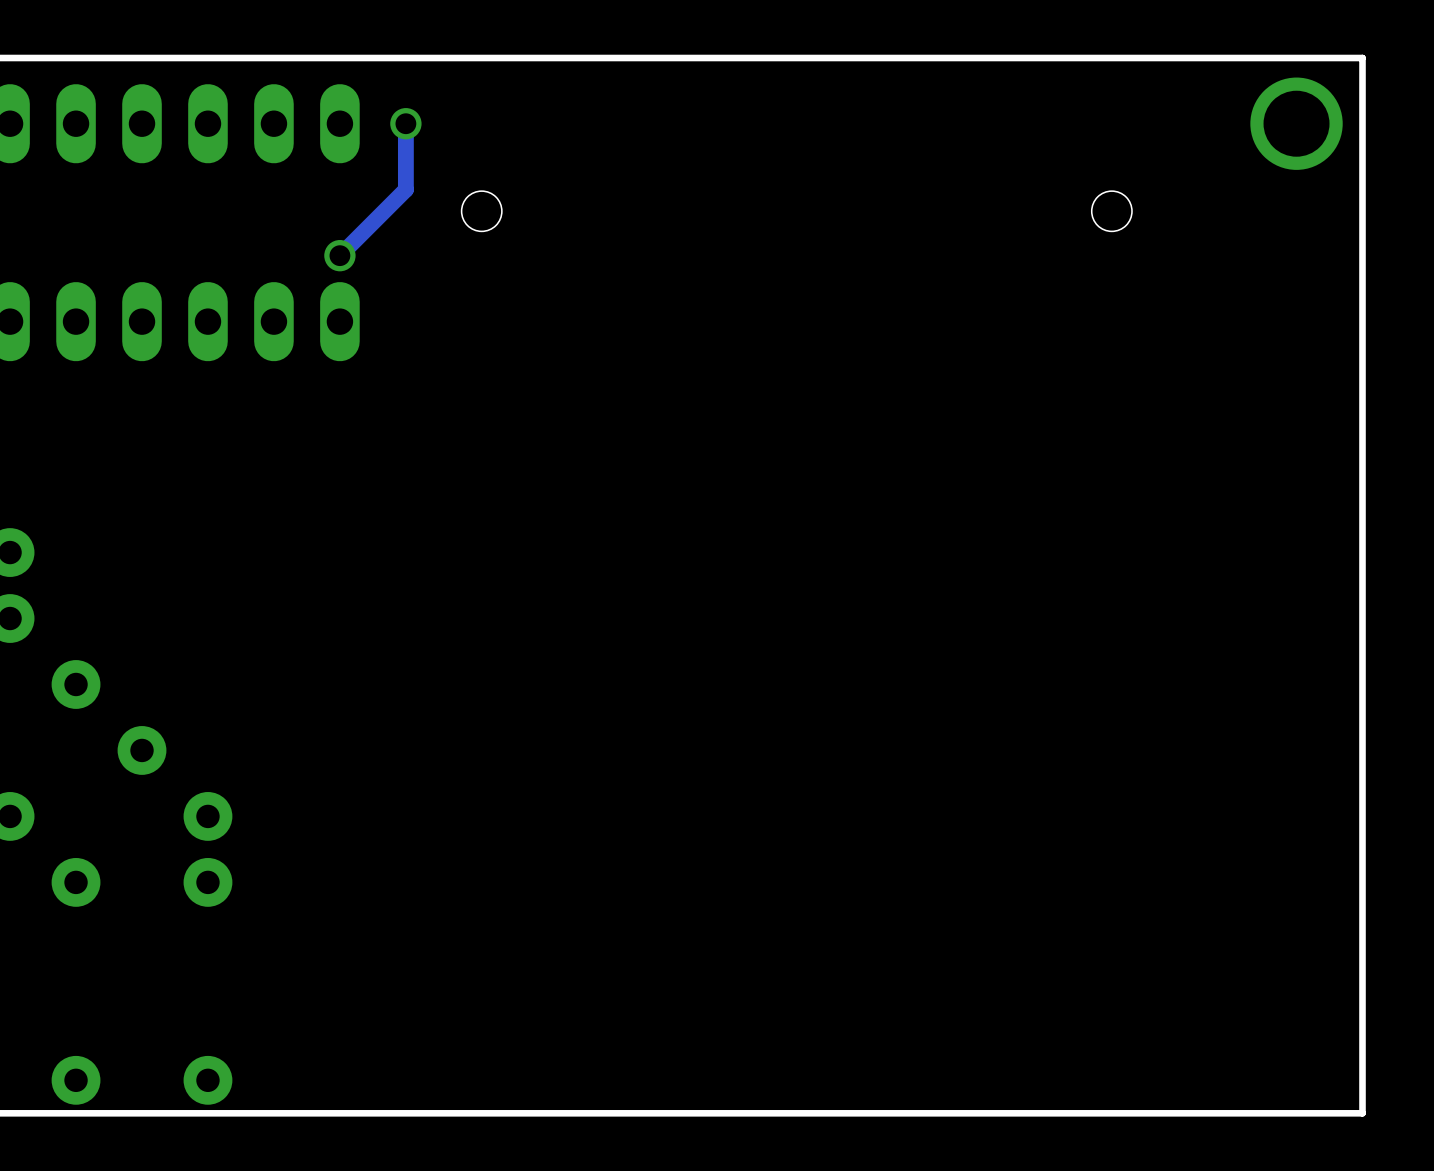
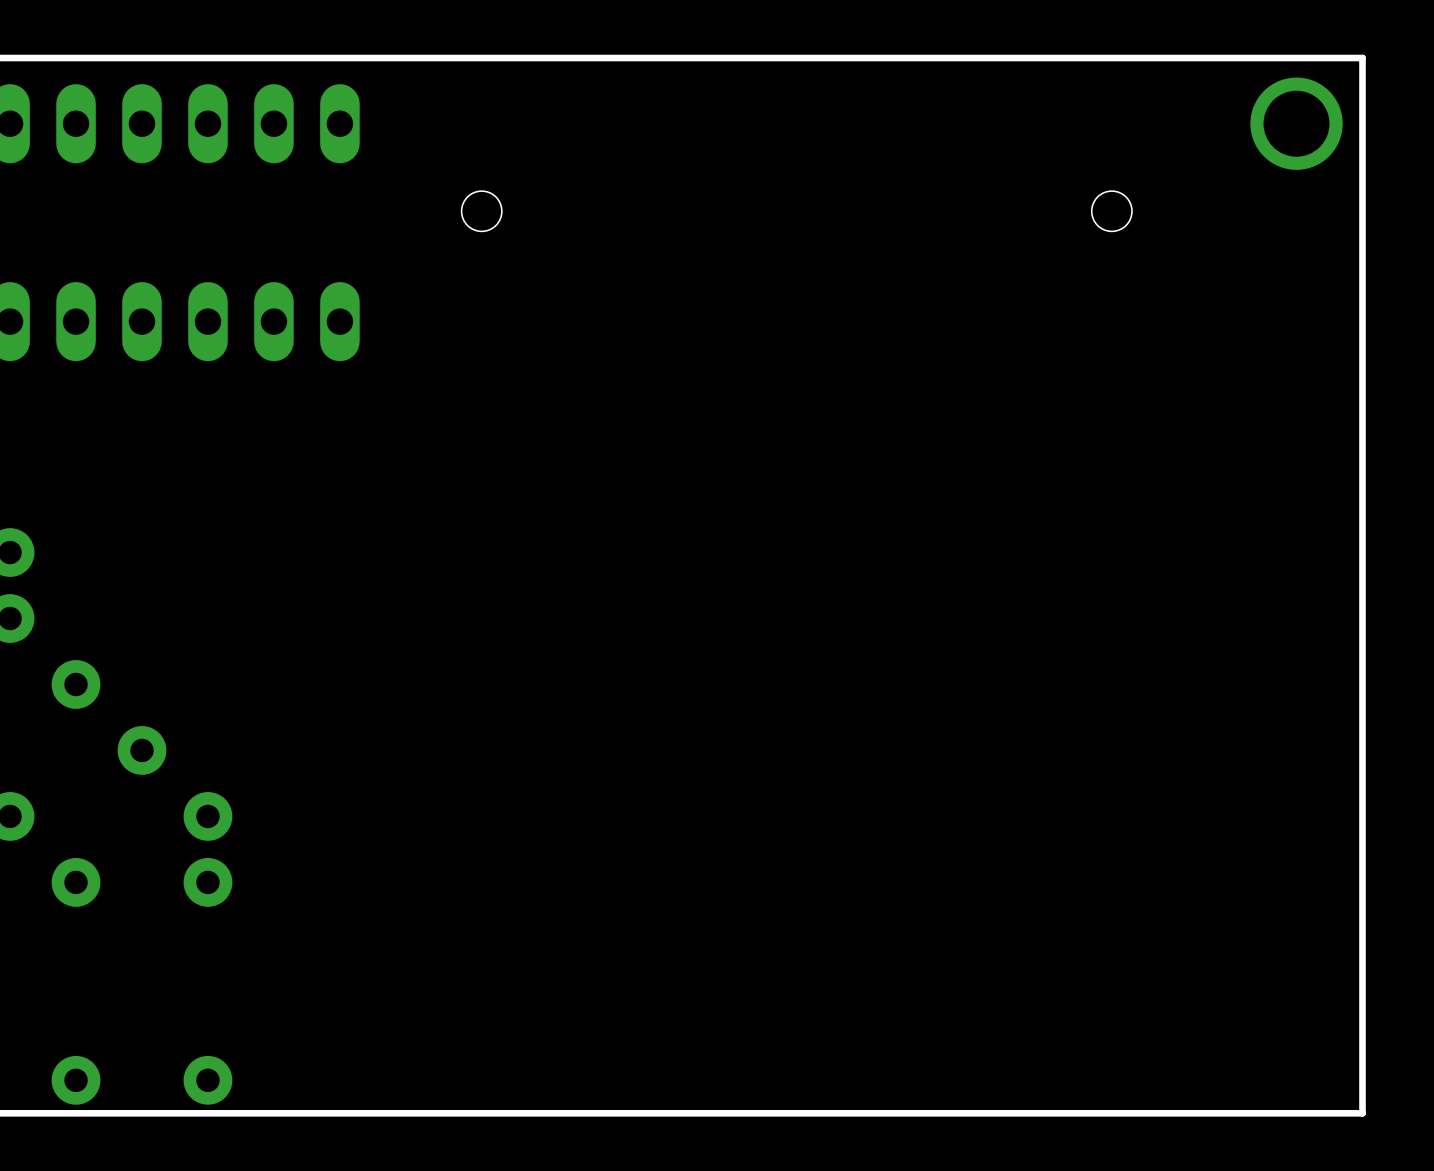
track: (405, 123) (405, 189) (339, 255) -> none
via: (405, 123) -> none
via: (339, 255) -> none

